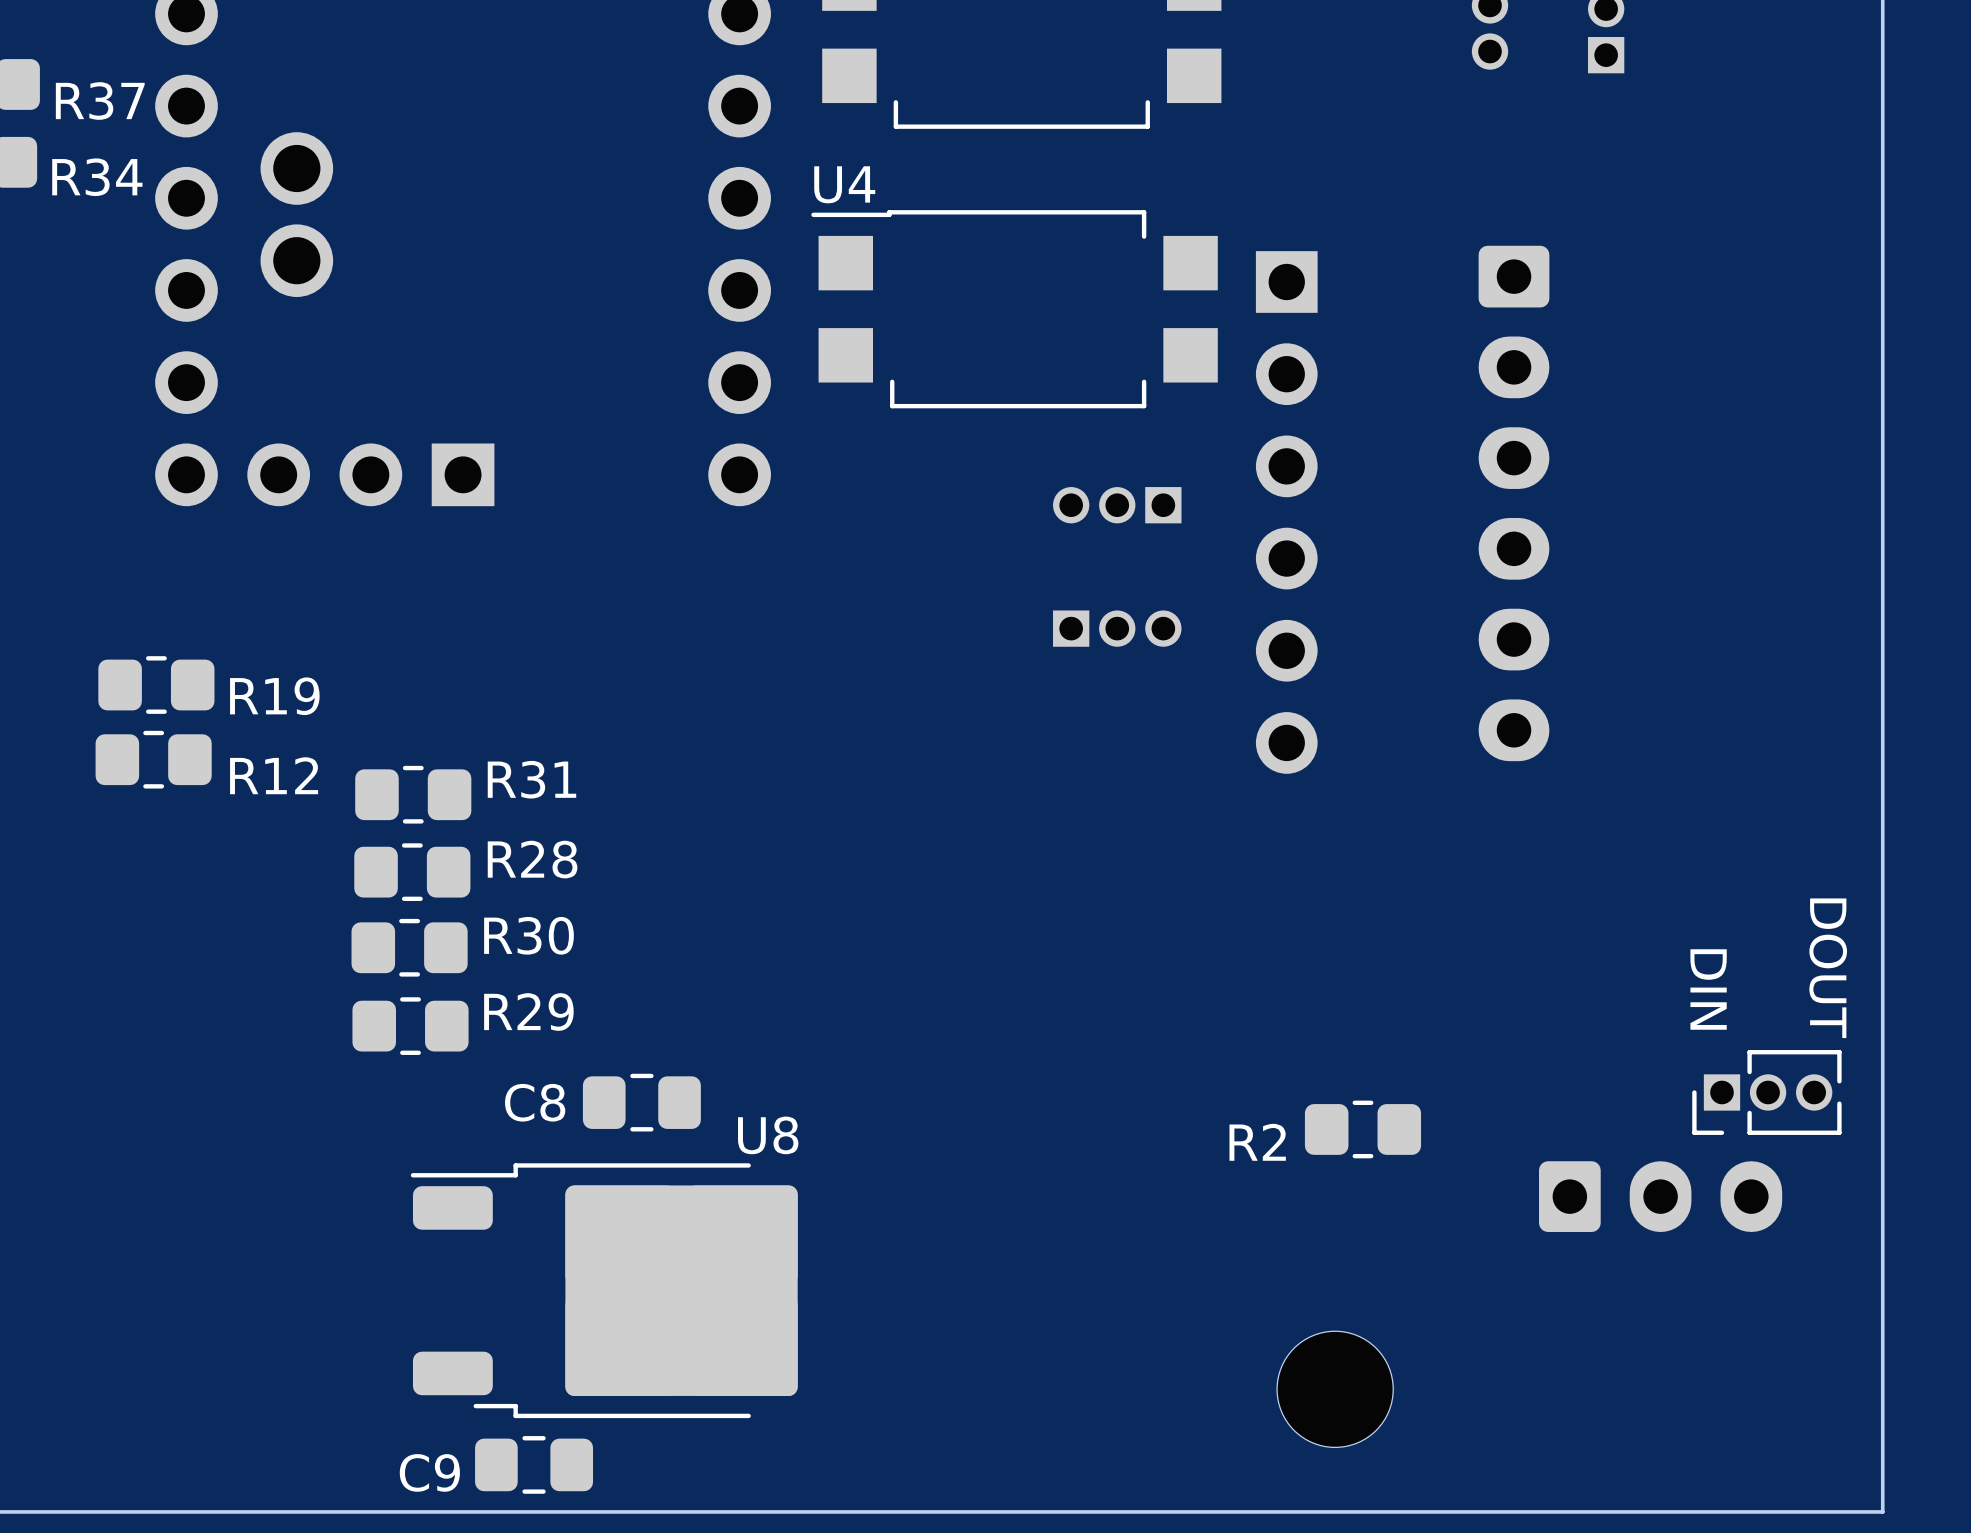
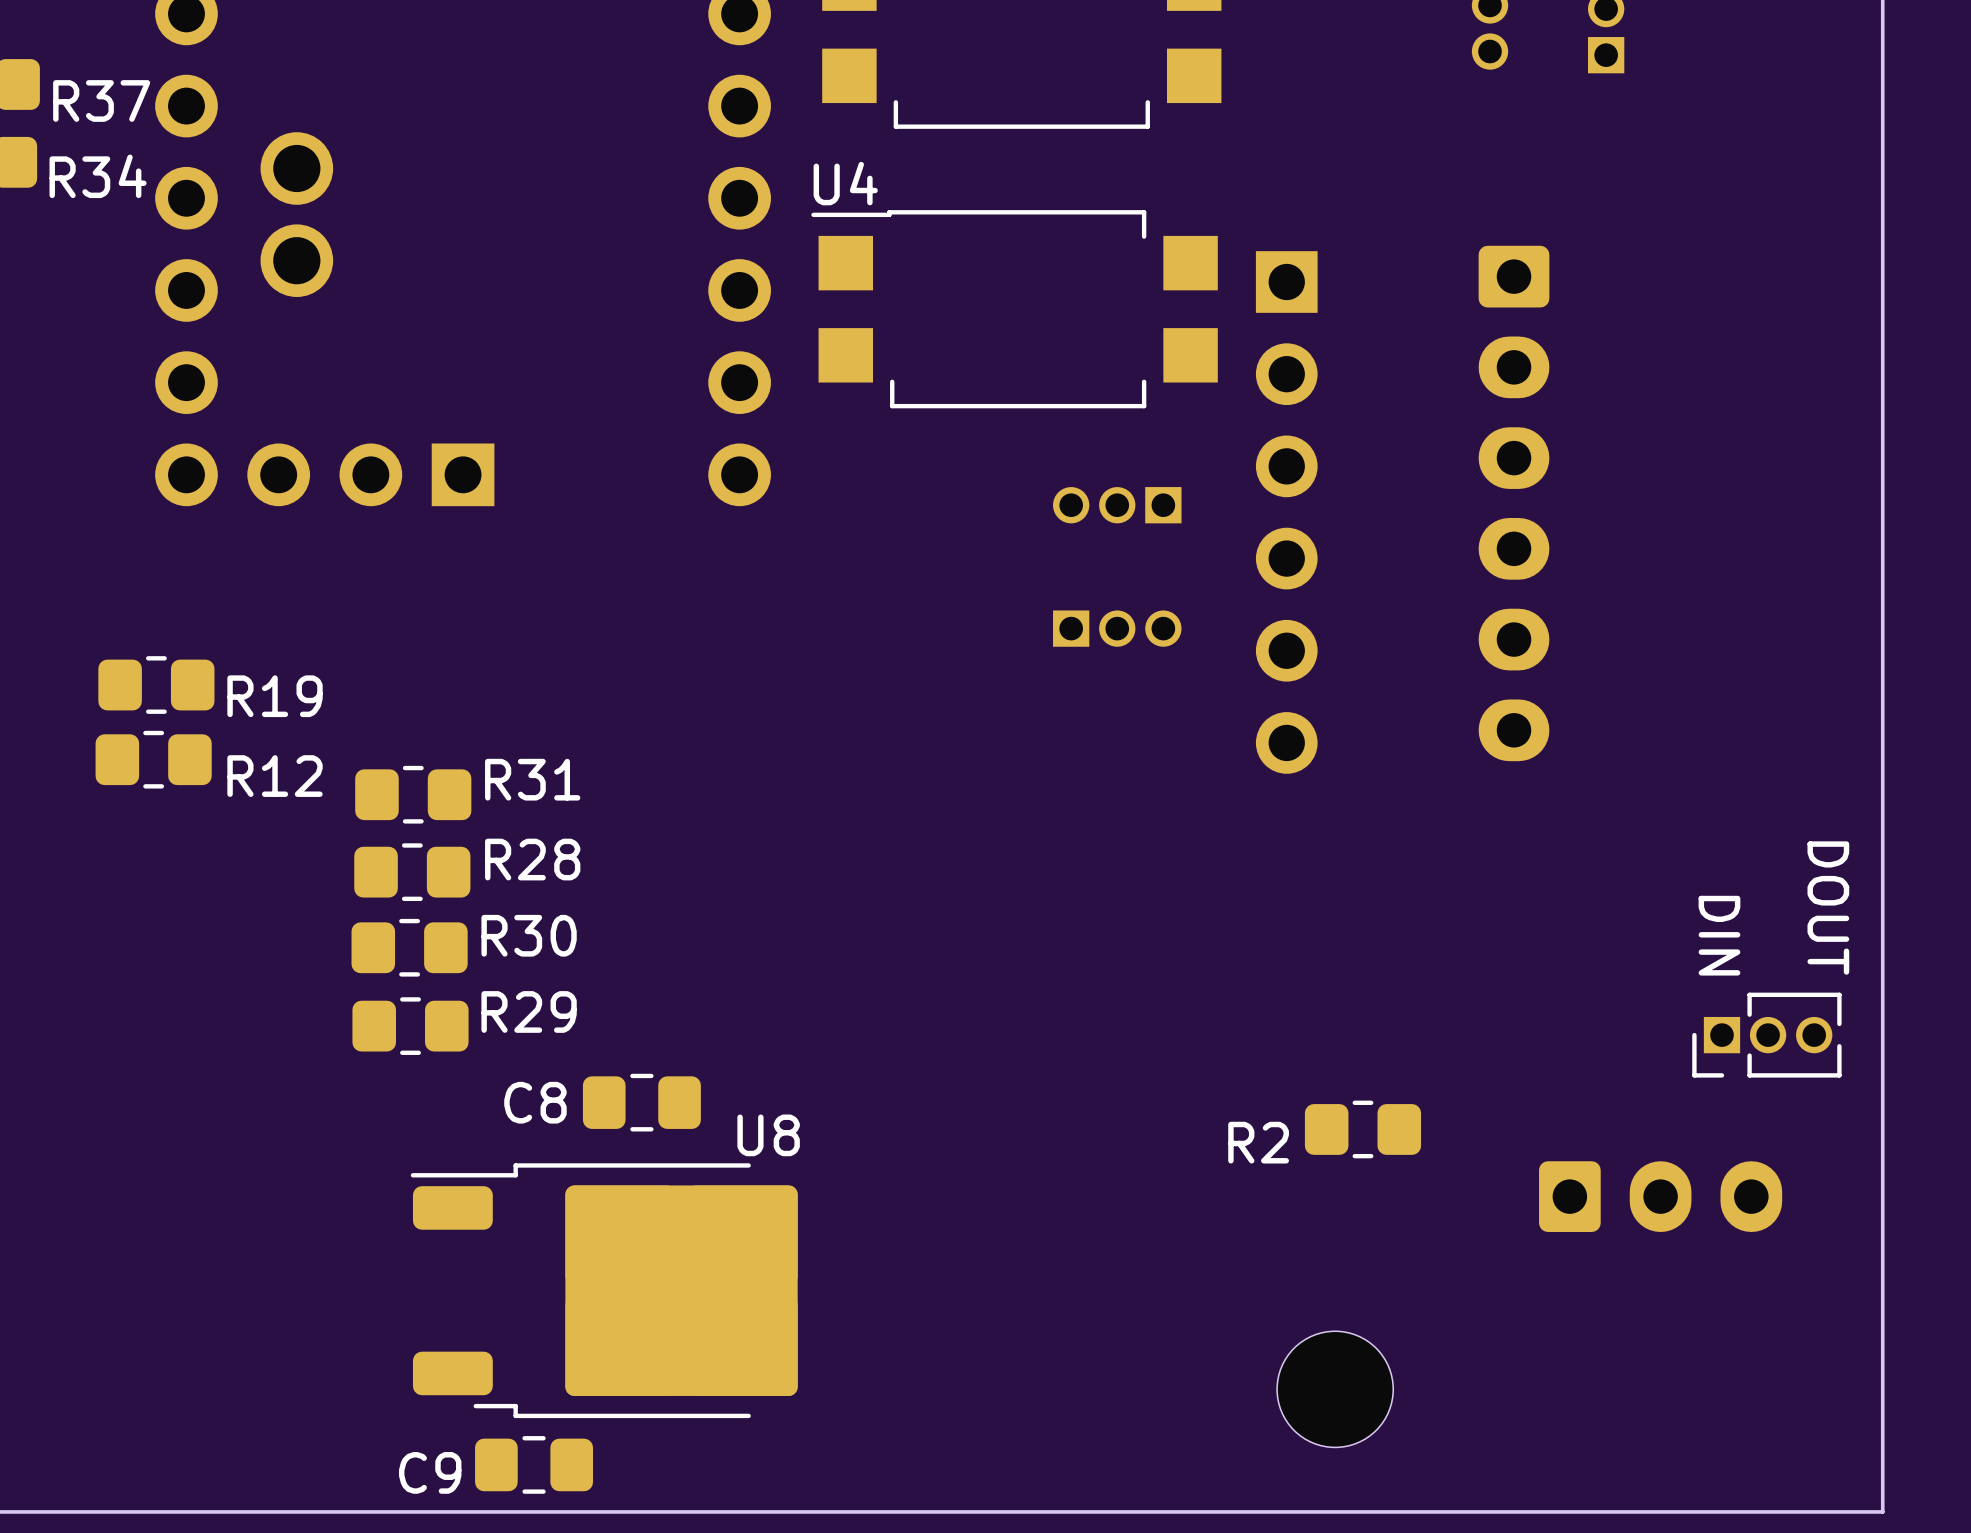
text position: DOUT (1828, 968) -> DOUT (1828, 908)
text position: DIN (1708, 989) -> DIN (1719, 935)
part position: (1766, 1092) -> (1766, 1035)

